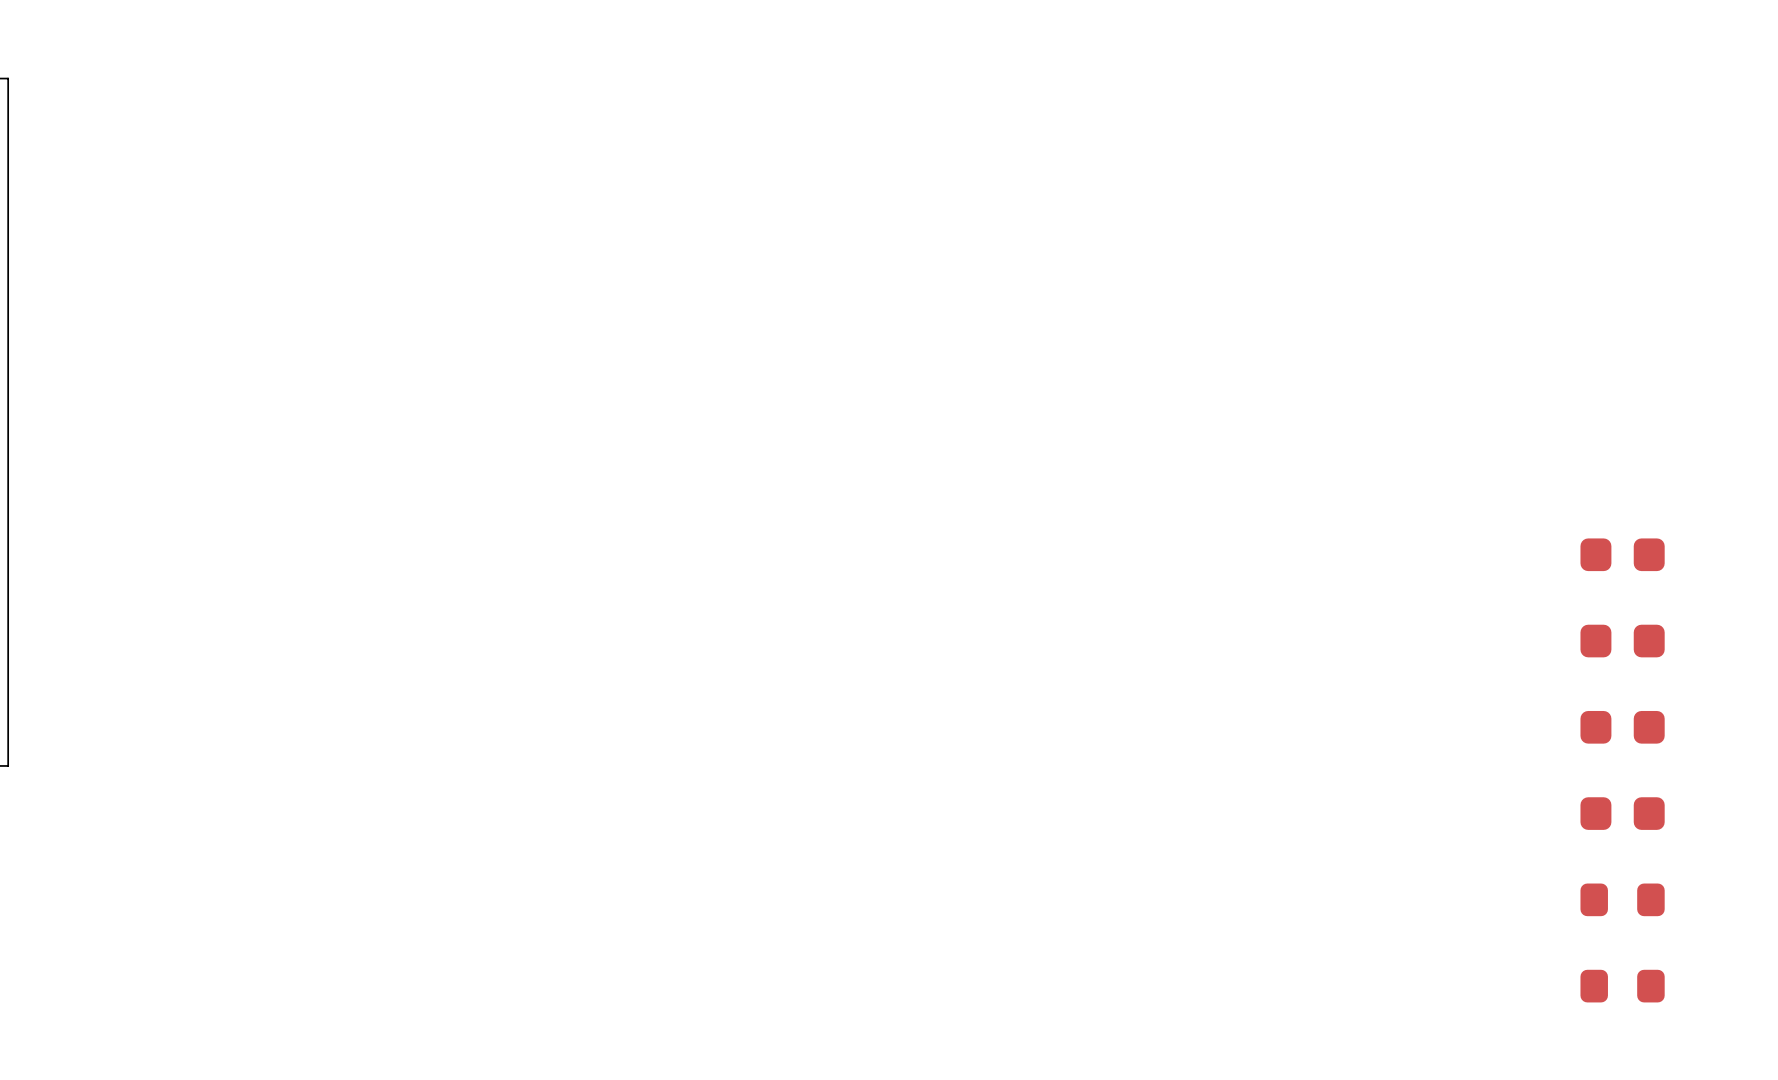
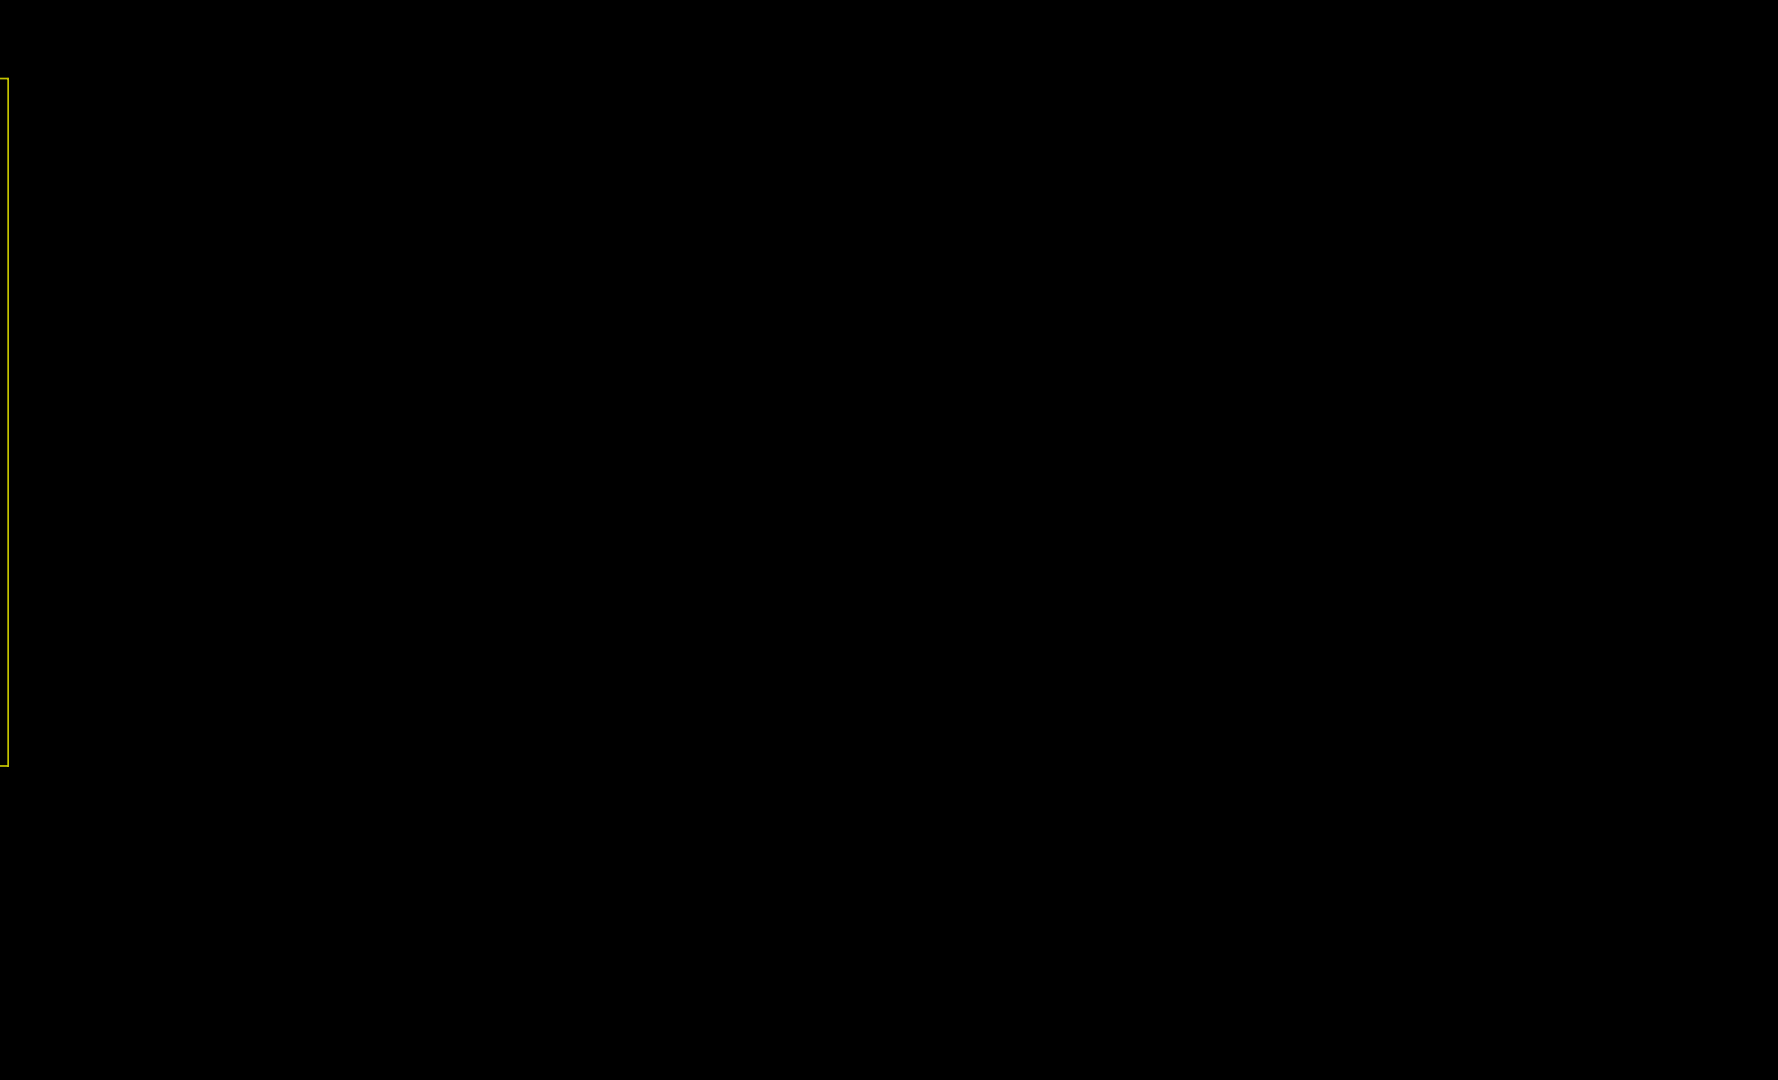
part: (1622, 554) -> none
part: (1622, 641) -> none
part: (1622, 727) -> none
part: (1622, 813) -> none
part: (1622, 899) -> none
part: (1622, 986) -> none

